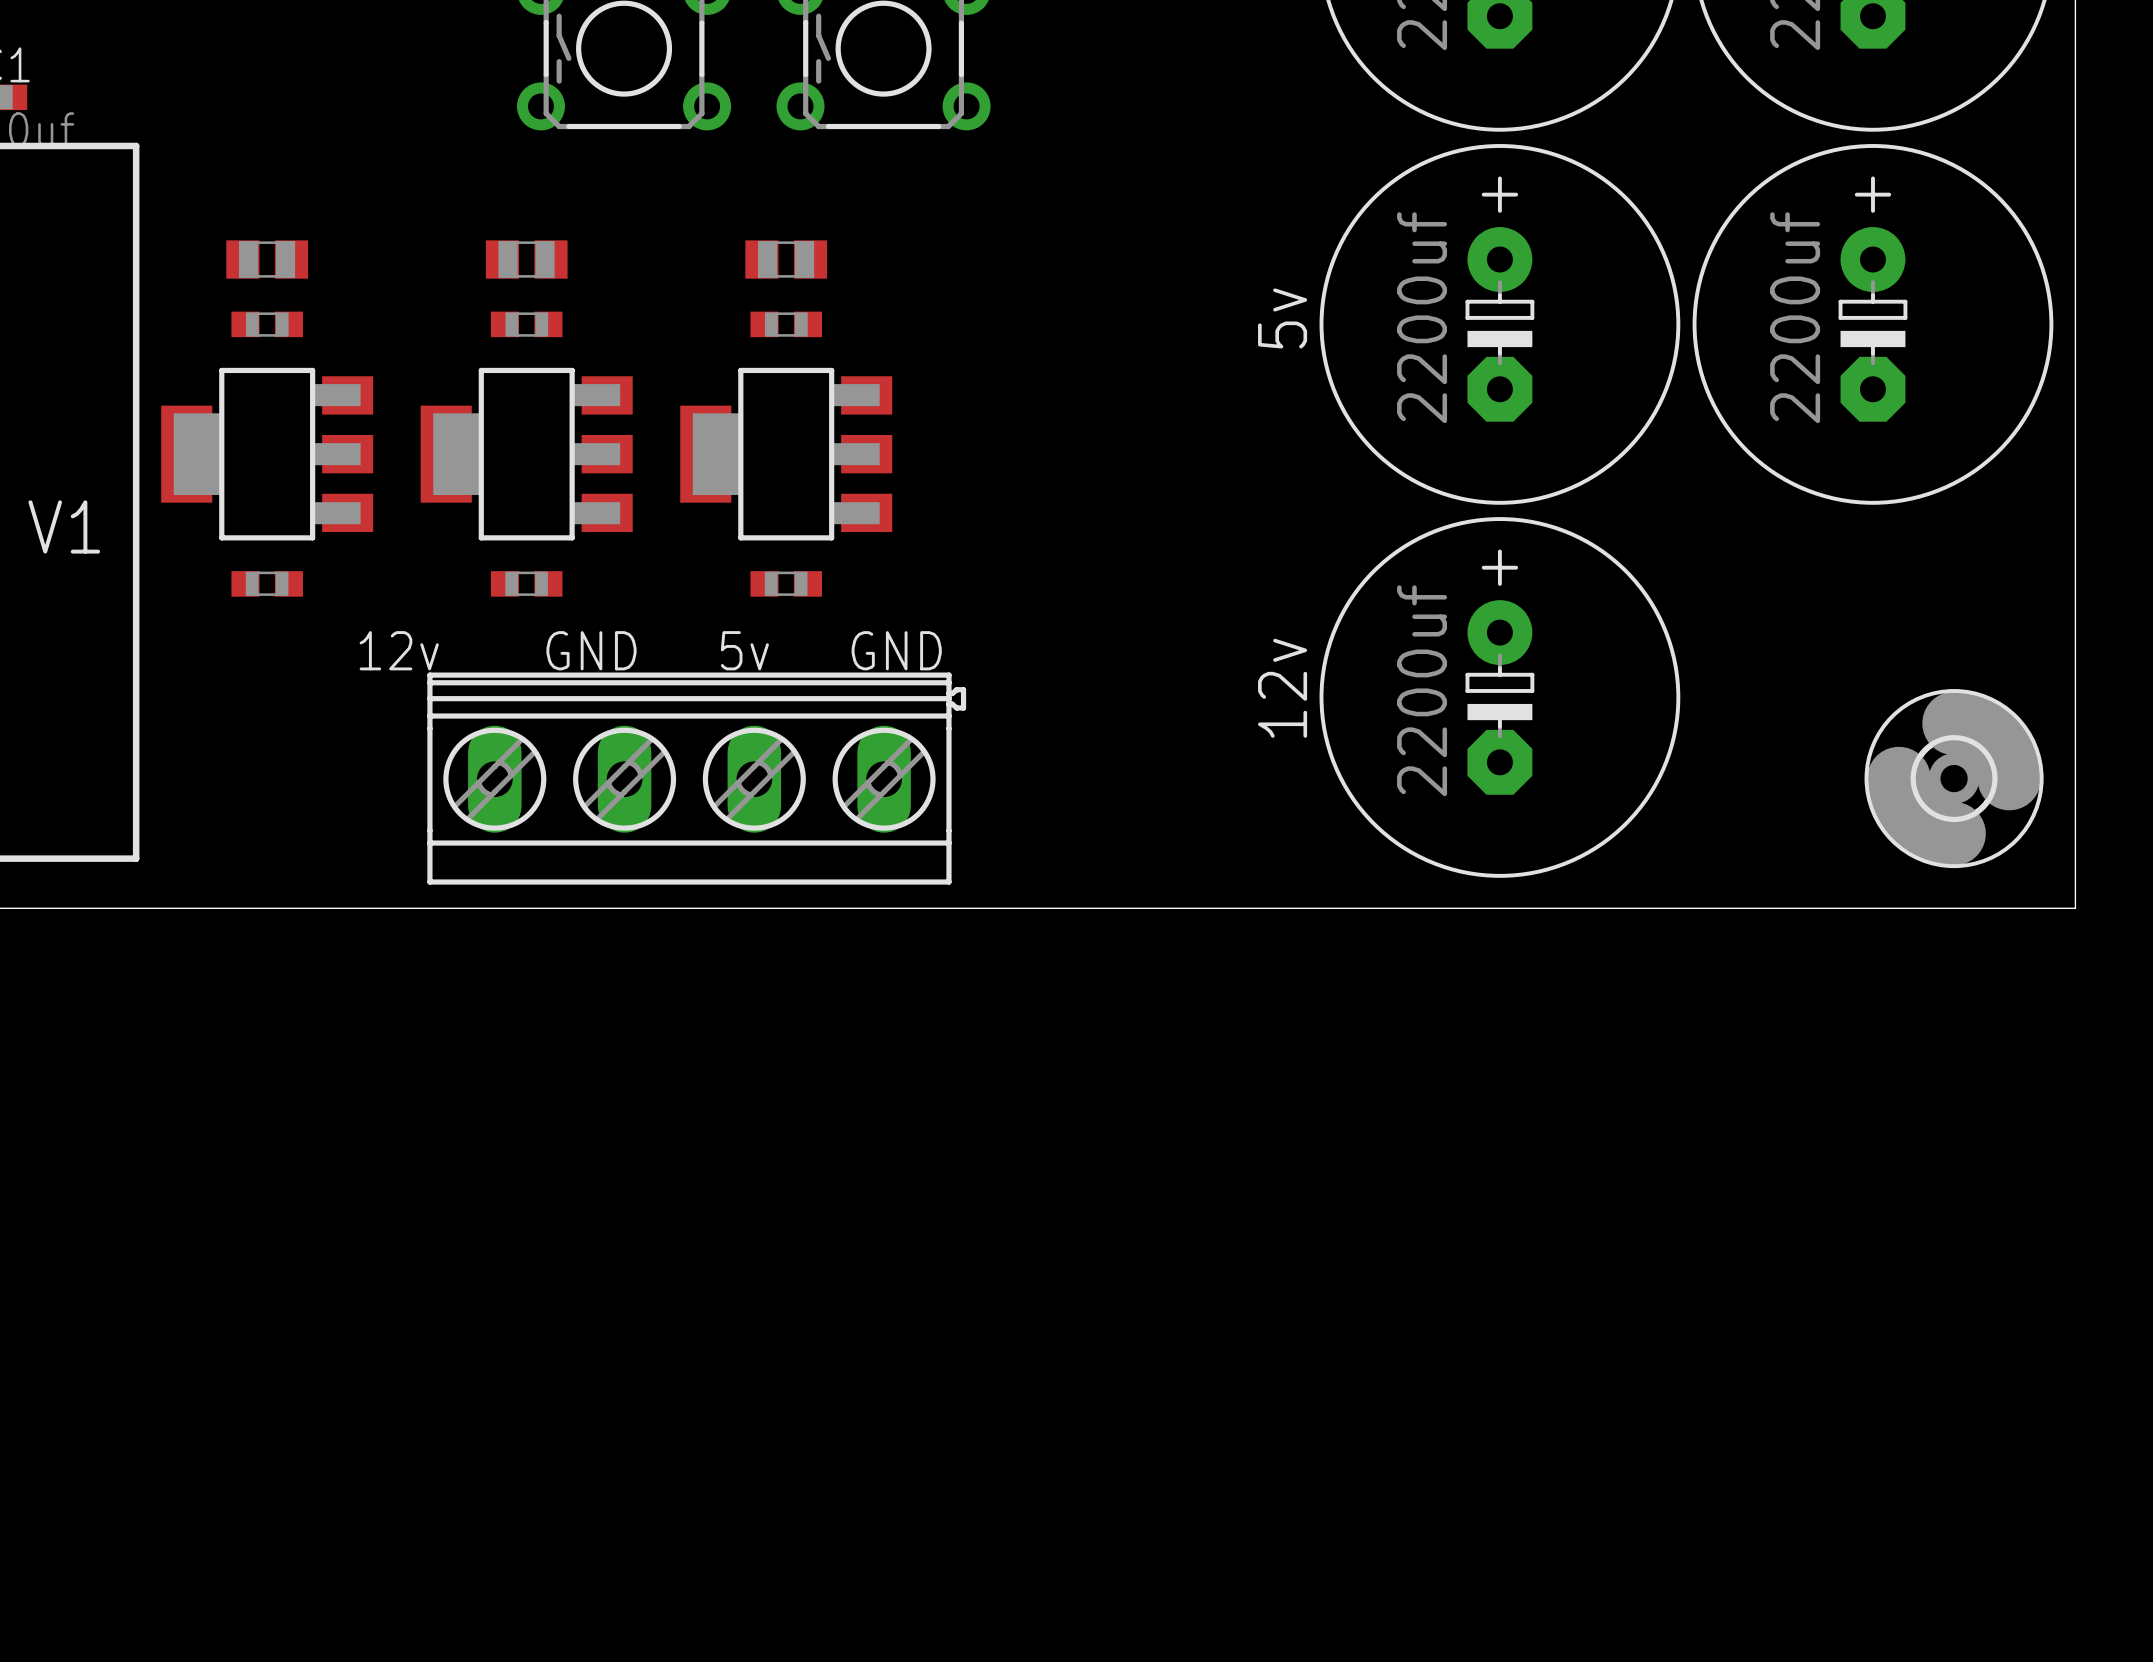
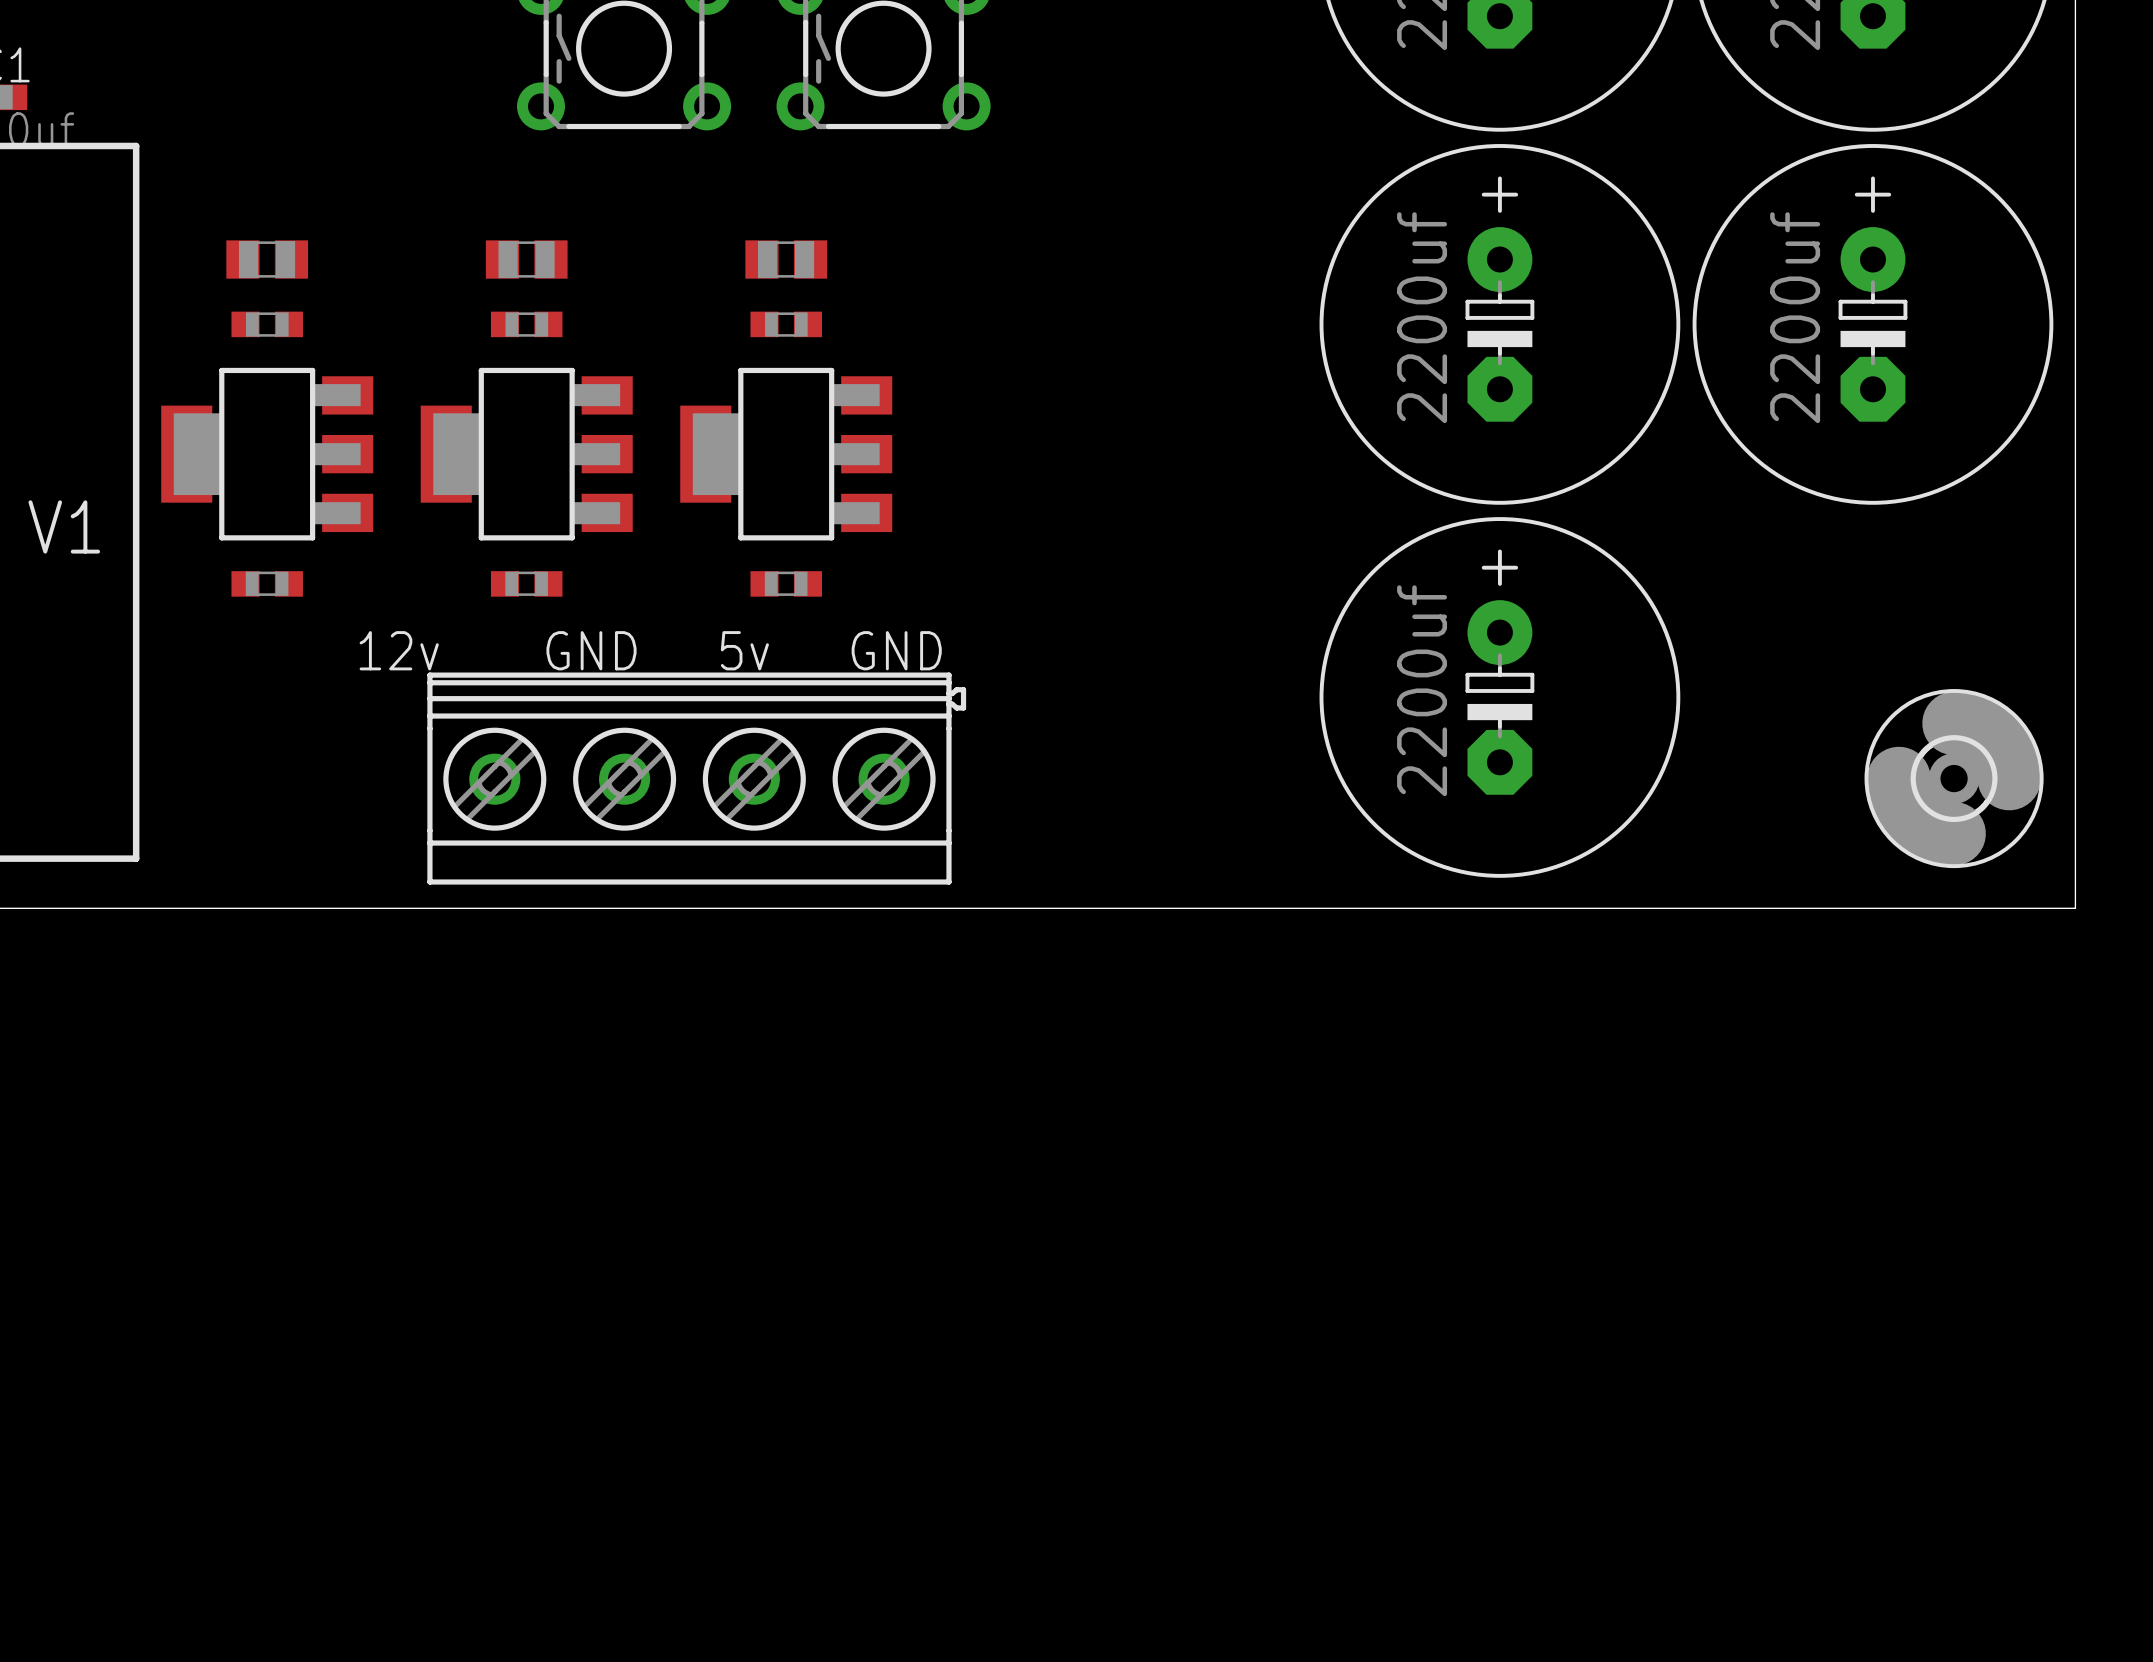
text: 5v (1282, 318) -> none
part footprint: [427, 672, 967, 885] -> [427, 672, 967, 885]
text: 12v (1282, 688) -> none

